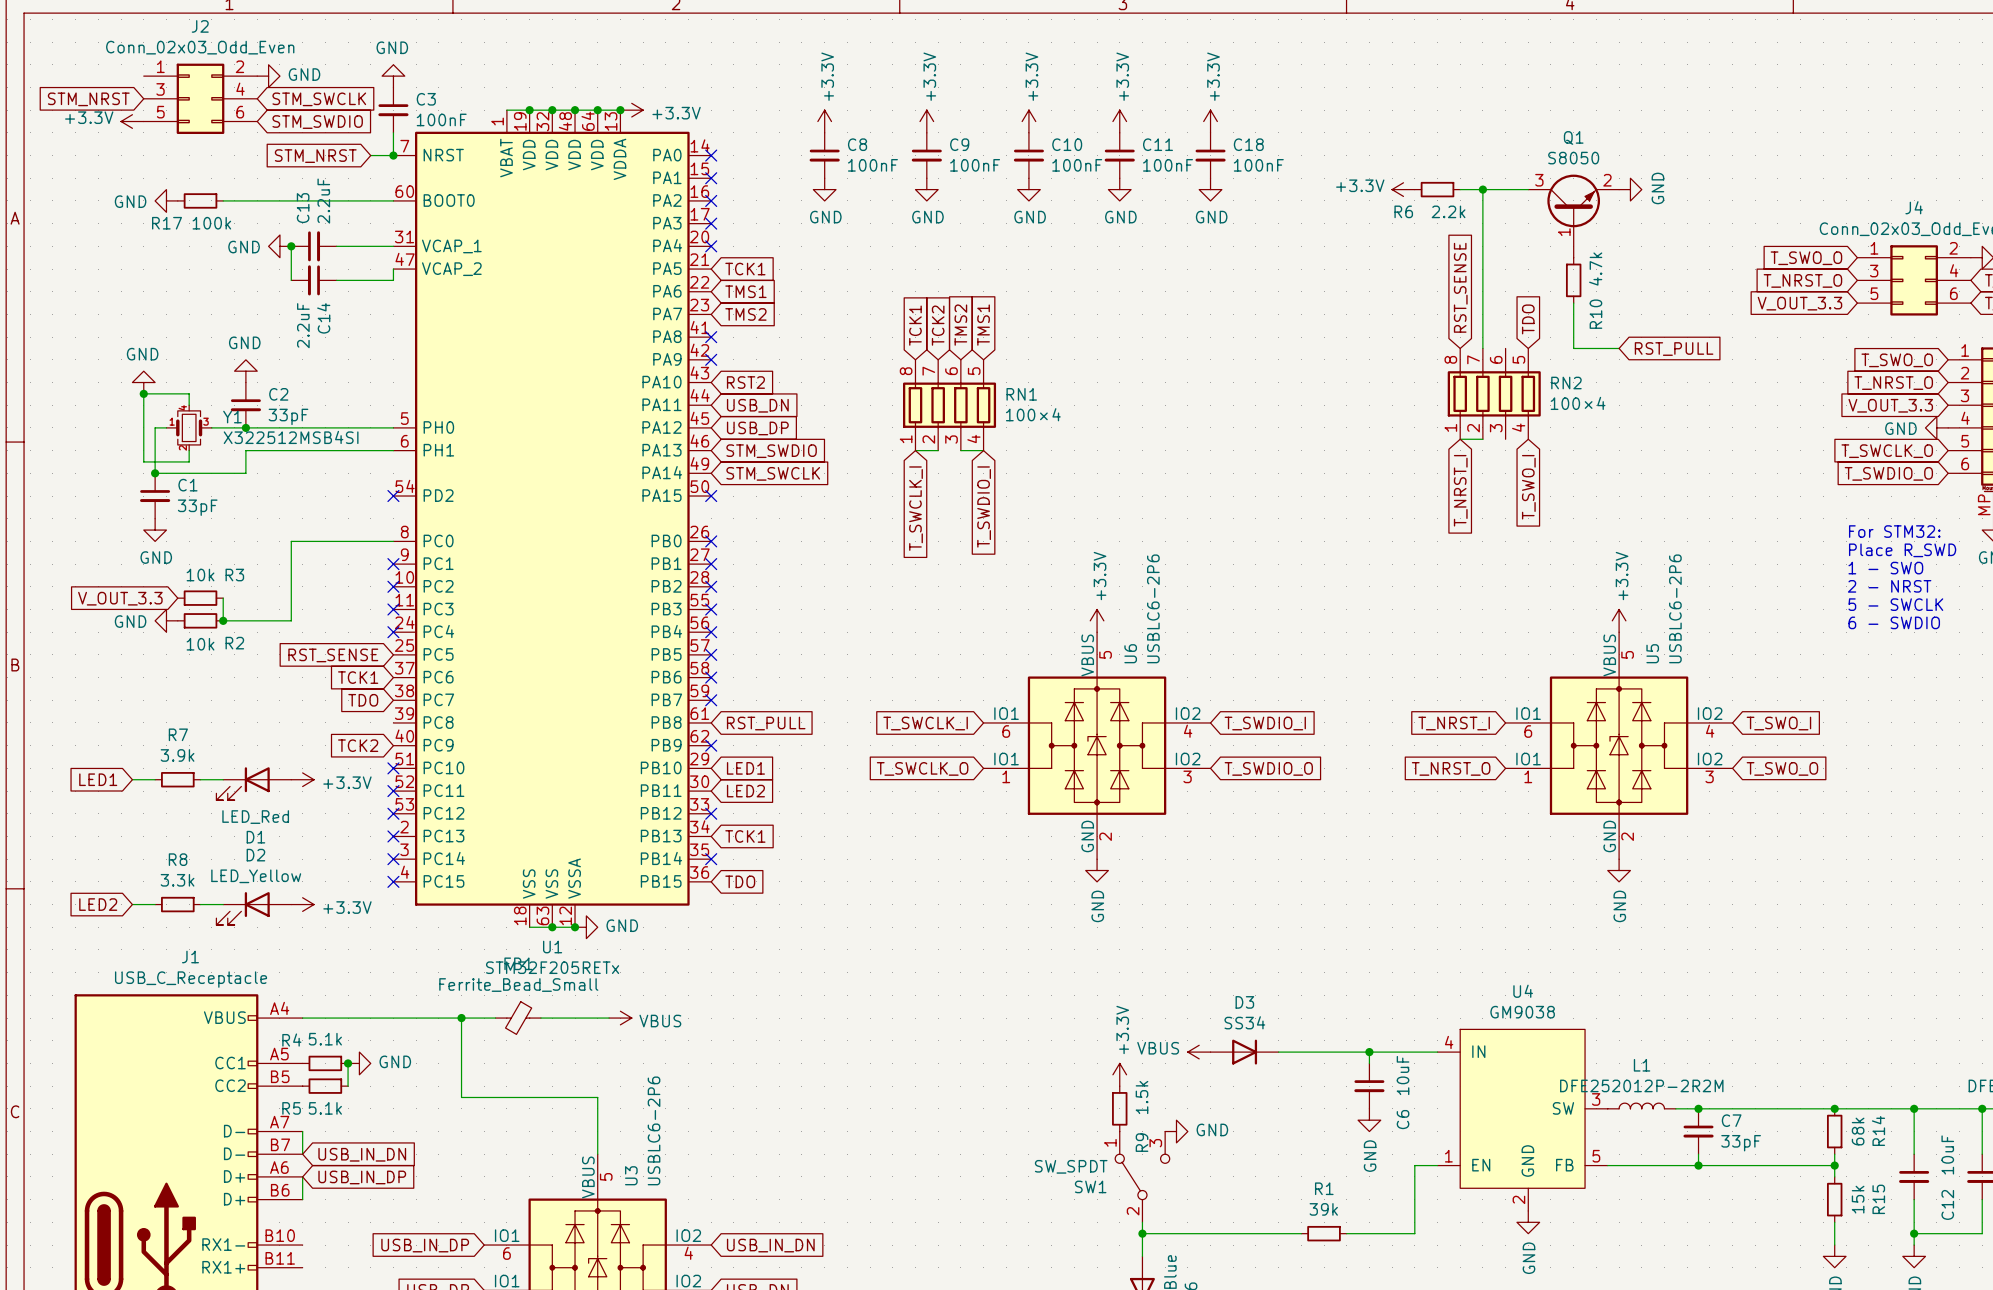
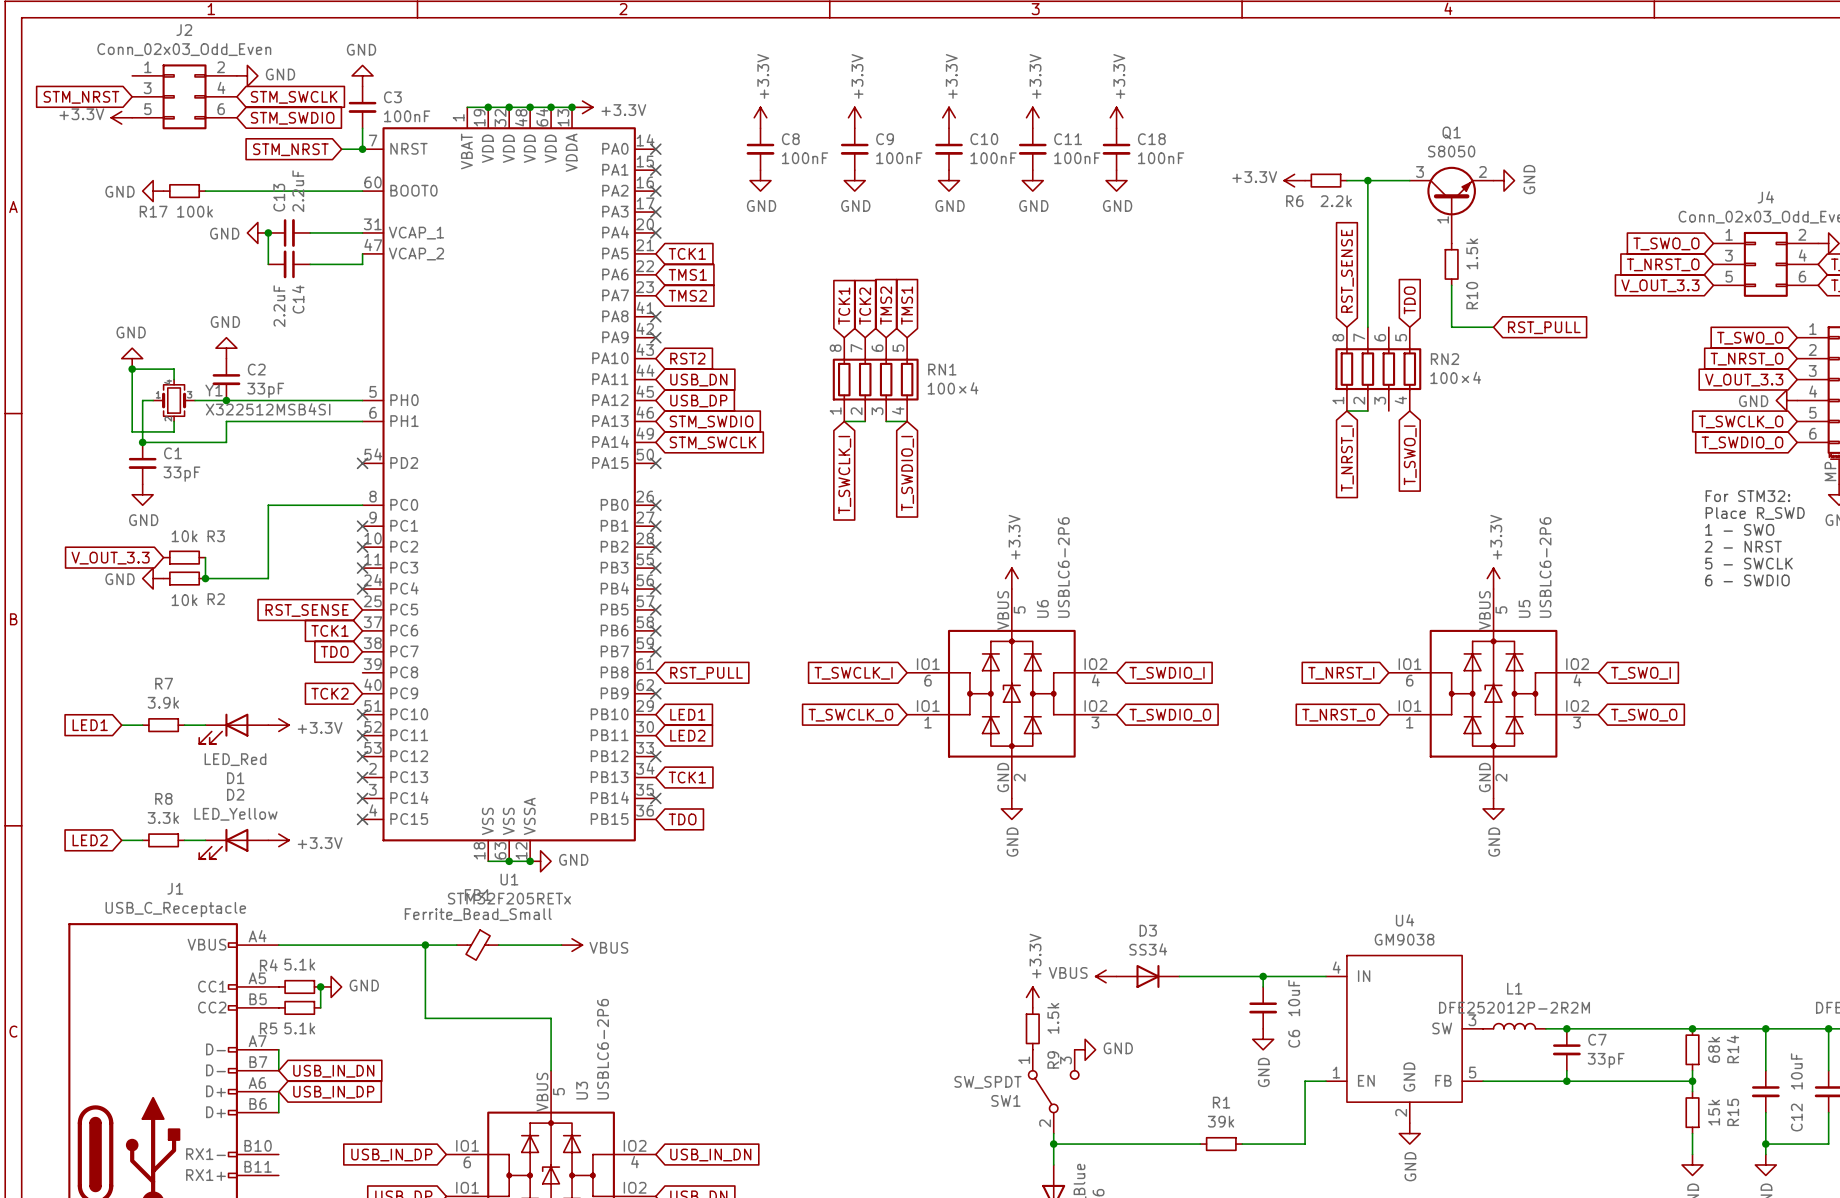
R10 value: 4.7k (1595, 269) -> 1.5k (1472, 253)

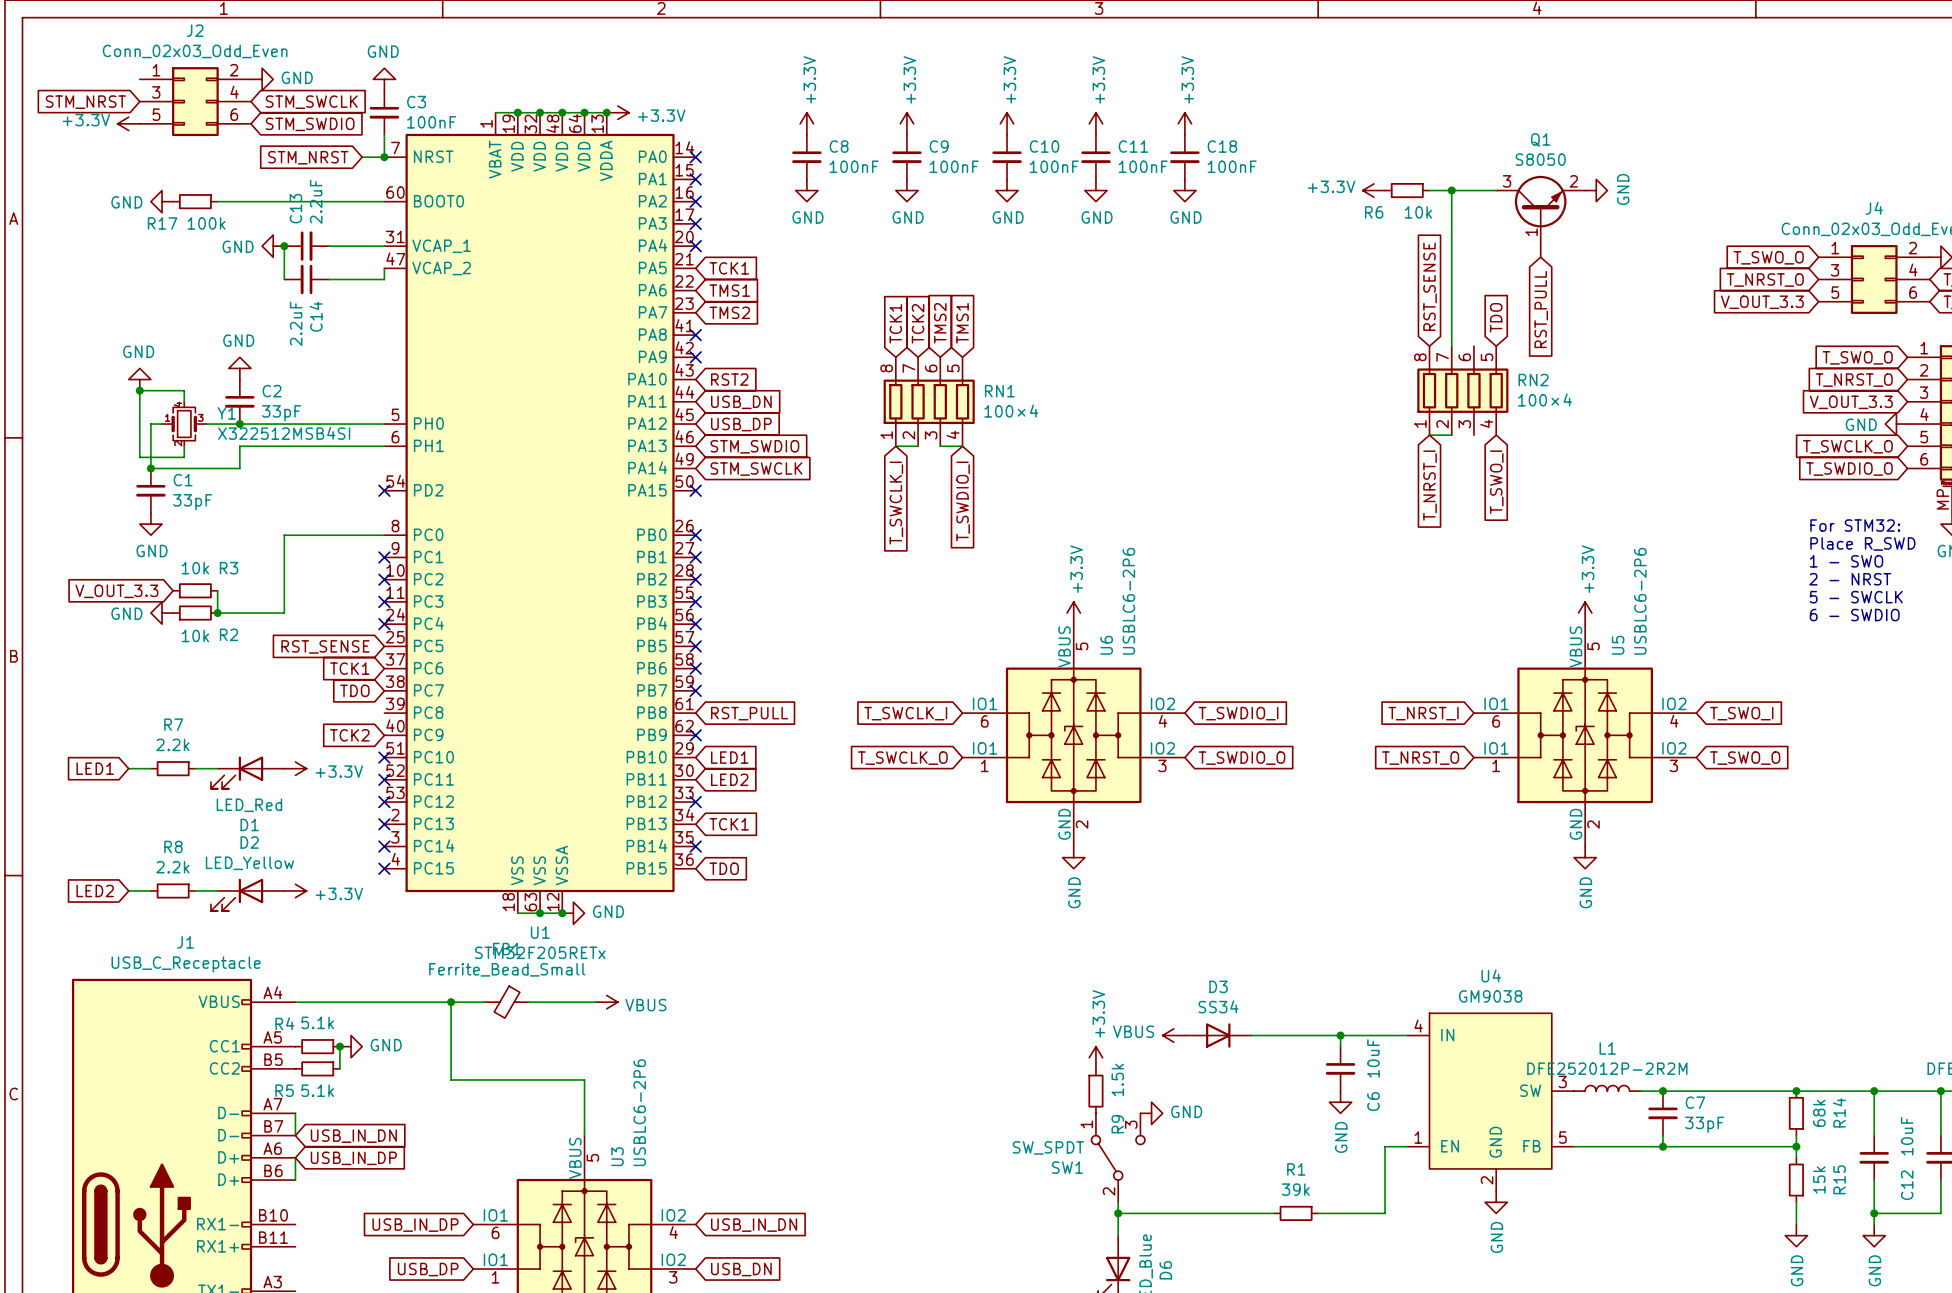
R6 value: 2.2k (1336, 201) -> 10k (1418, 212)
R10: 1.5k (1451, 264) -> none
wire: (1451, 285) (1451, 327) (1493, 327) -> none
global label rotation: 0° (1544, 327) -> 90° clockwise (1541, 309)
R7 value: 3.9k (163, 702) -> 2.2k (172, 744)
R8 value: 3.3k (163, 817) -> 2.2k (172, 867)

